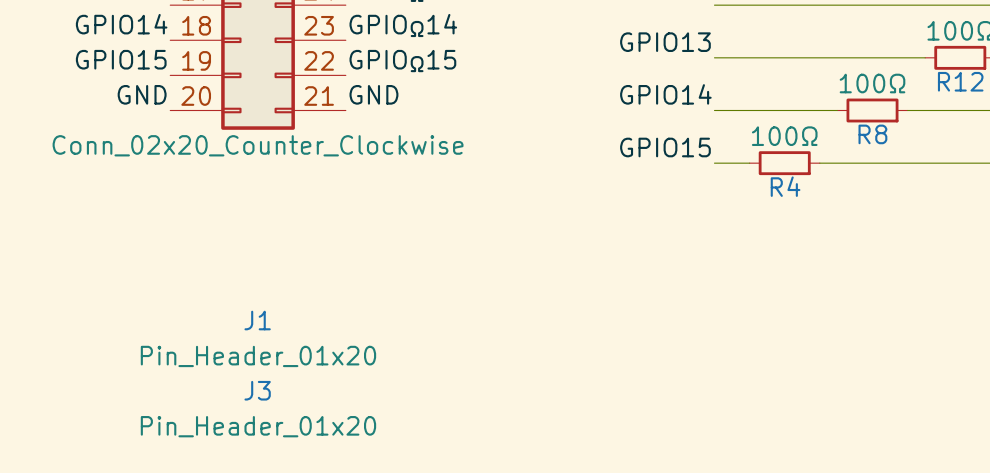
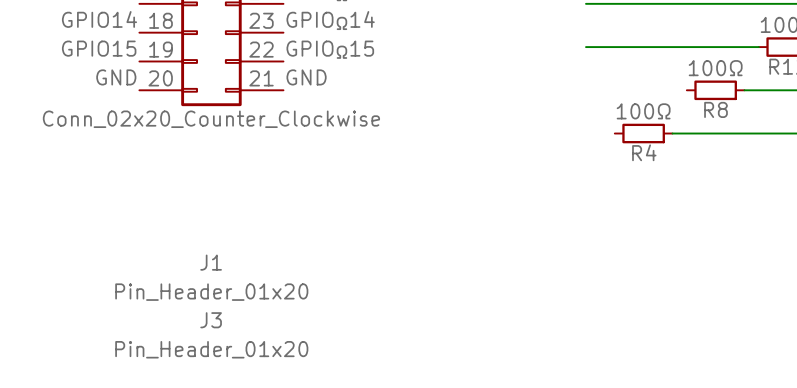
label: GPIO13 (665, 42) -> none
label: GPIO14 (665, 94) -> none
wire: (714, 110) (837, 110) -> none
label: GPIO15 (665, 147) -> none
wire: (714, 163) (749, 163) -> none

